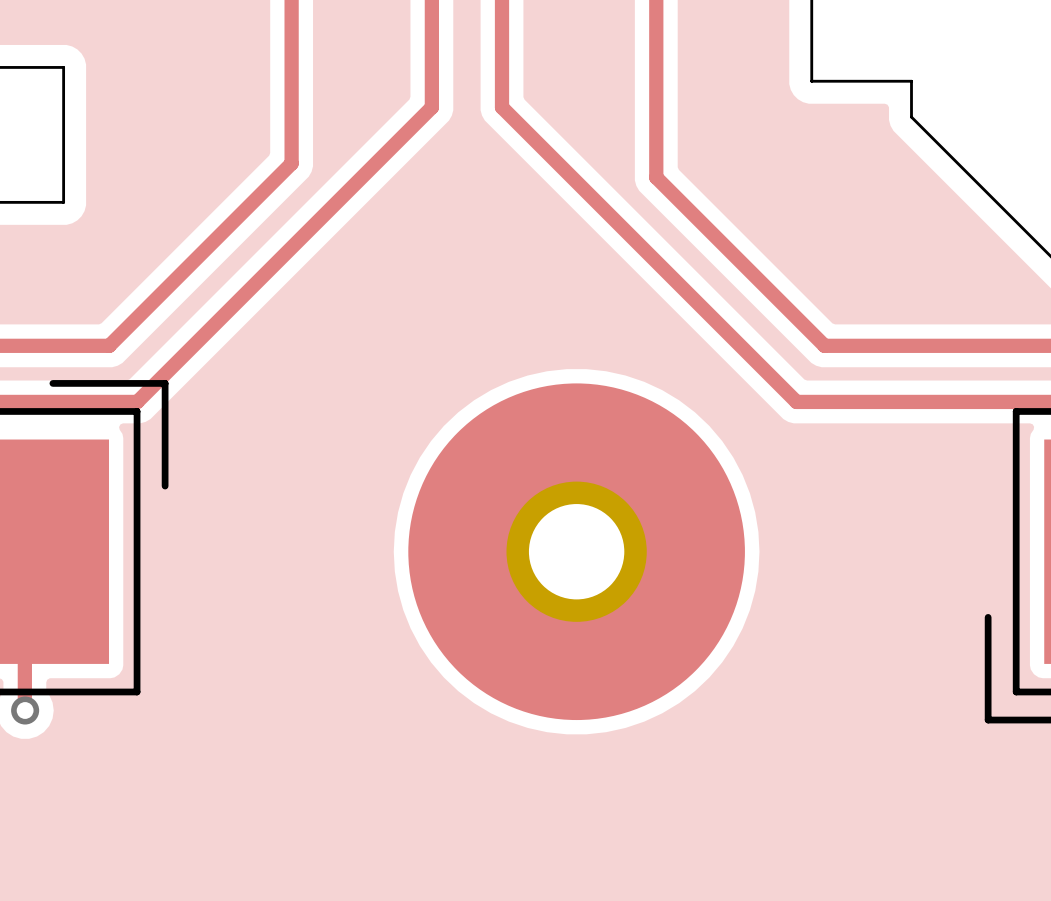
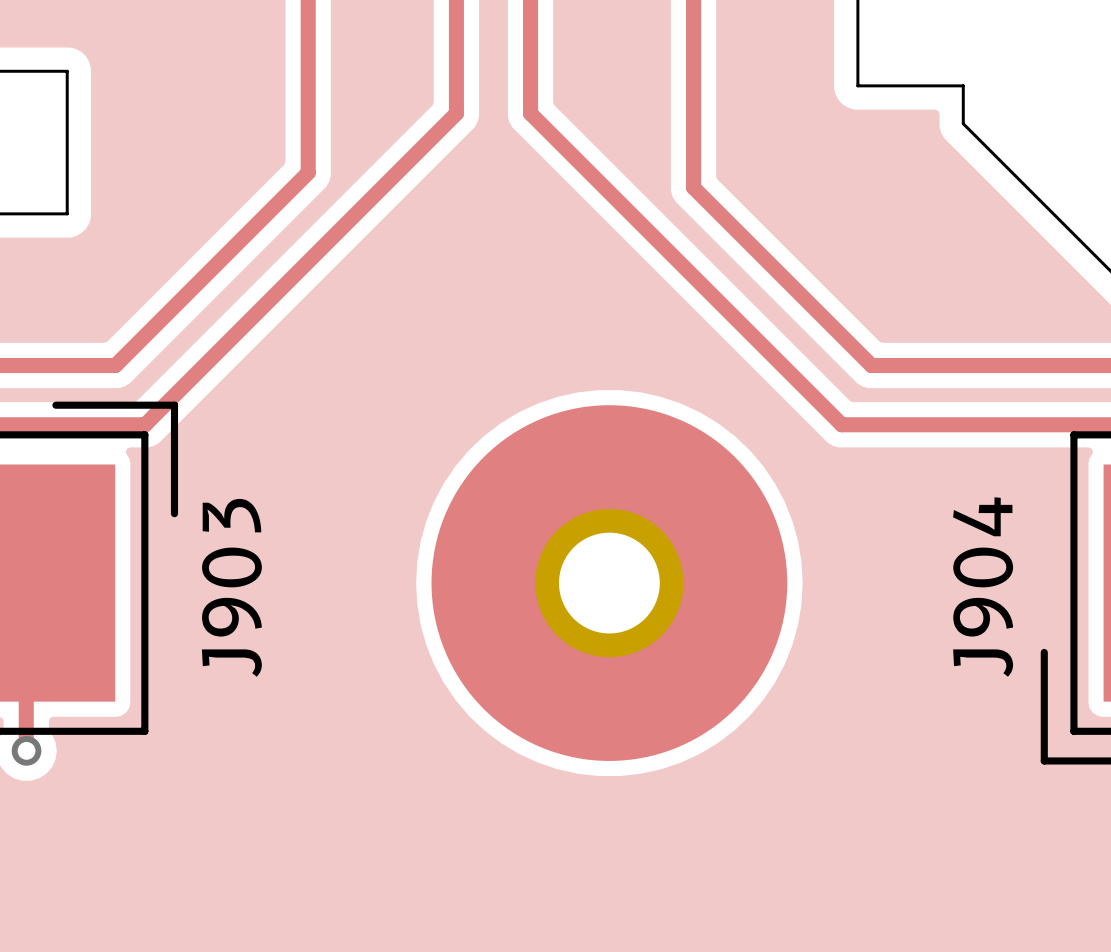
J904 name: none -> J904 (983, 586)
J903 name: none -> J903 (231, 587)

